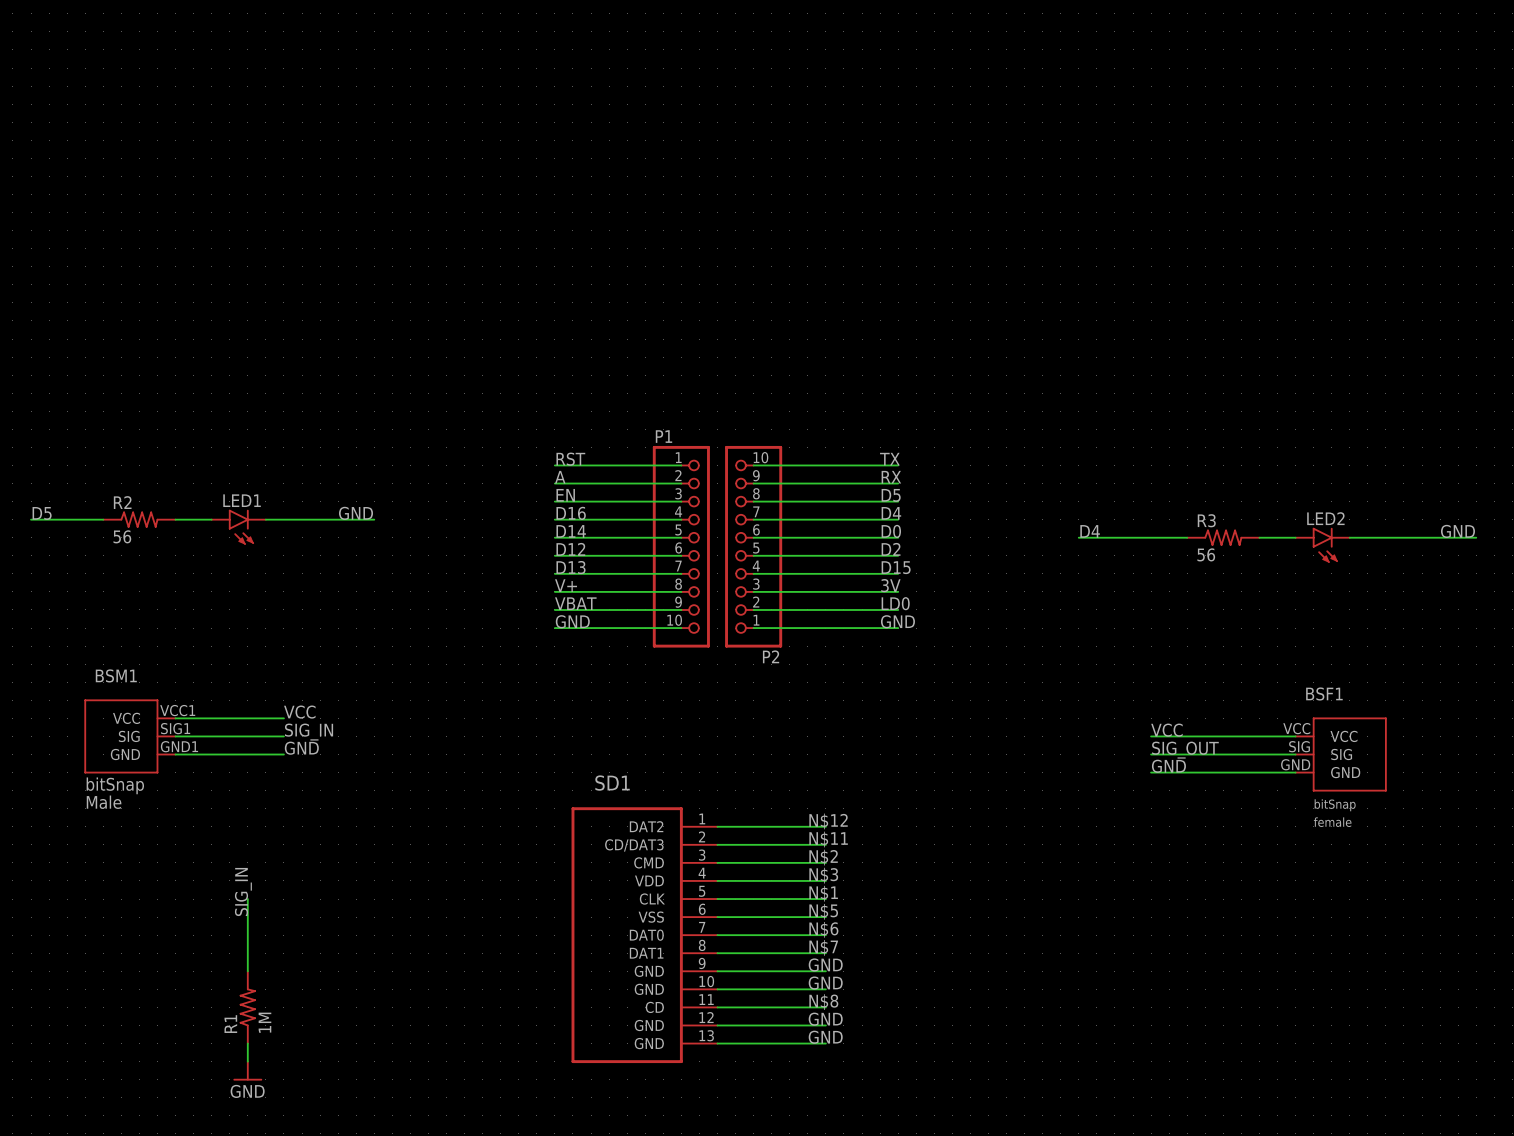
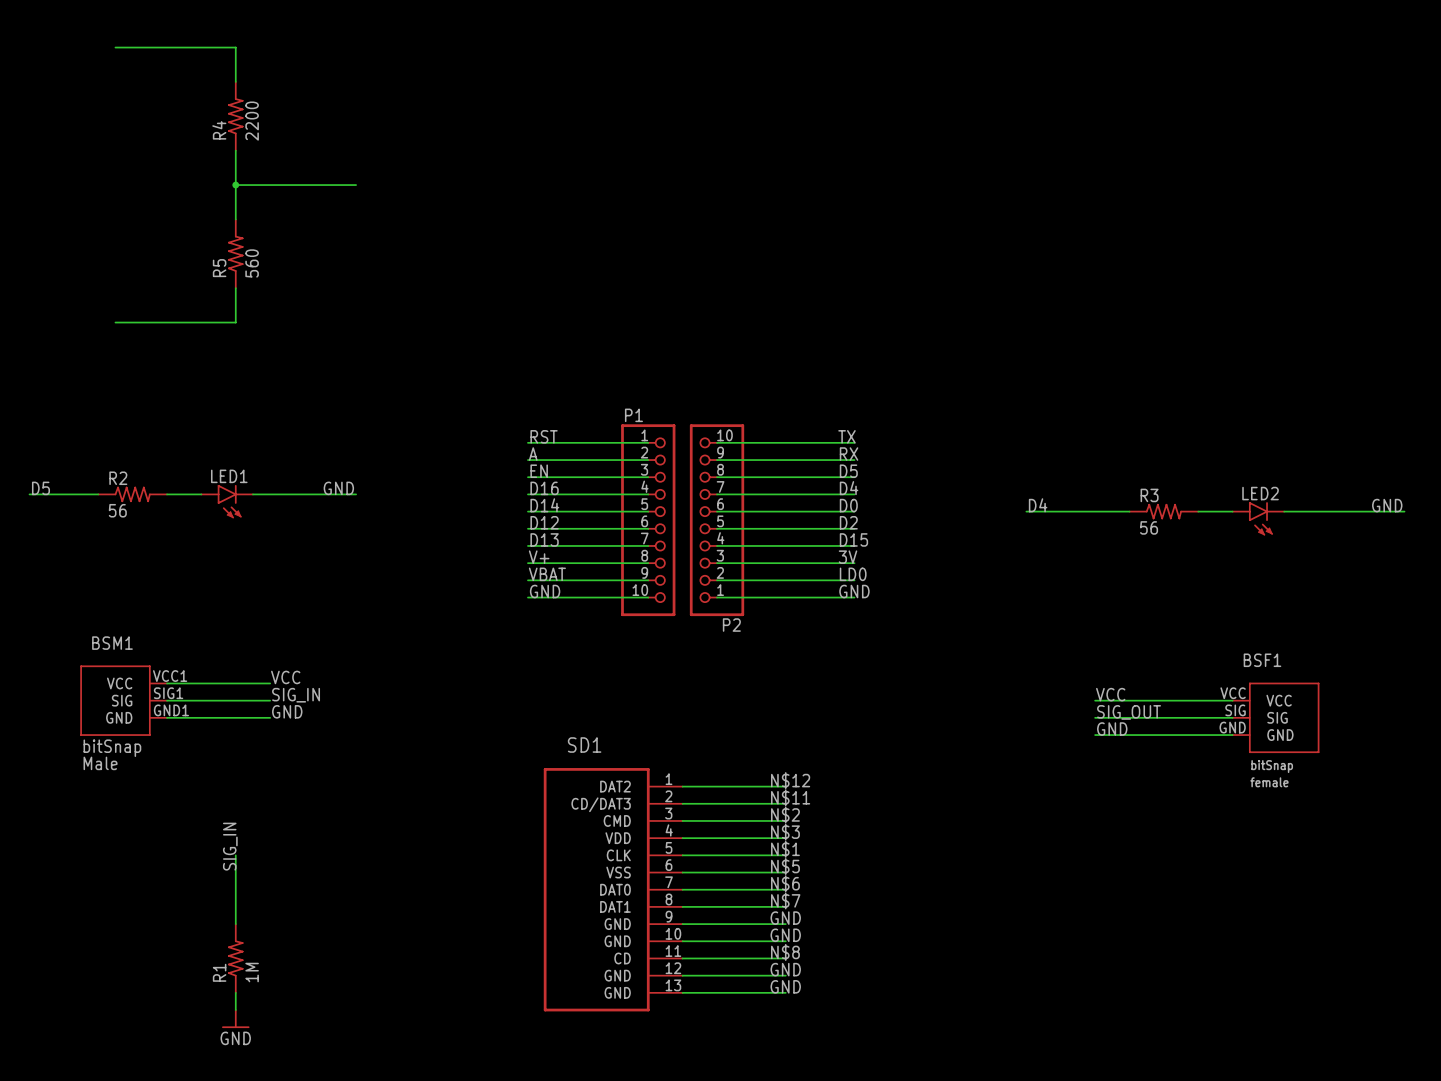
wire: none -> (115, 47) (235, 47) (235, 81)
R4: none -> 2200 (235, 116)
wire: none -> (235, 150) (235, 219)
wire: none -> (235, 185) (356, 185)
junction: none -> (235, 185)
R5: none -> 560 (235, 253)
wire: none -> (235, 288) (235, 322) (115, 322)

